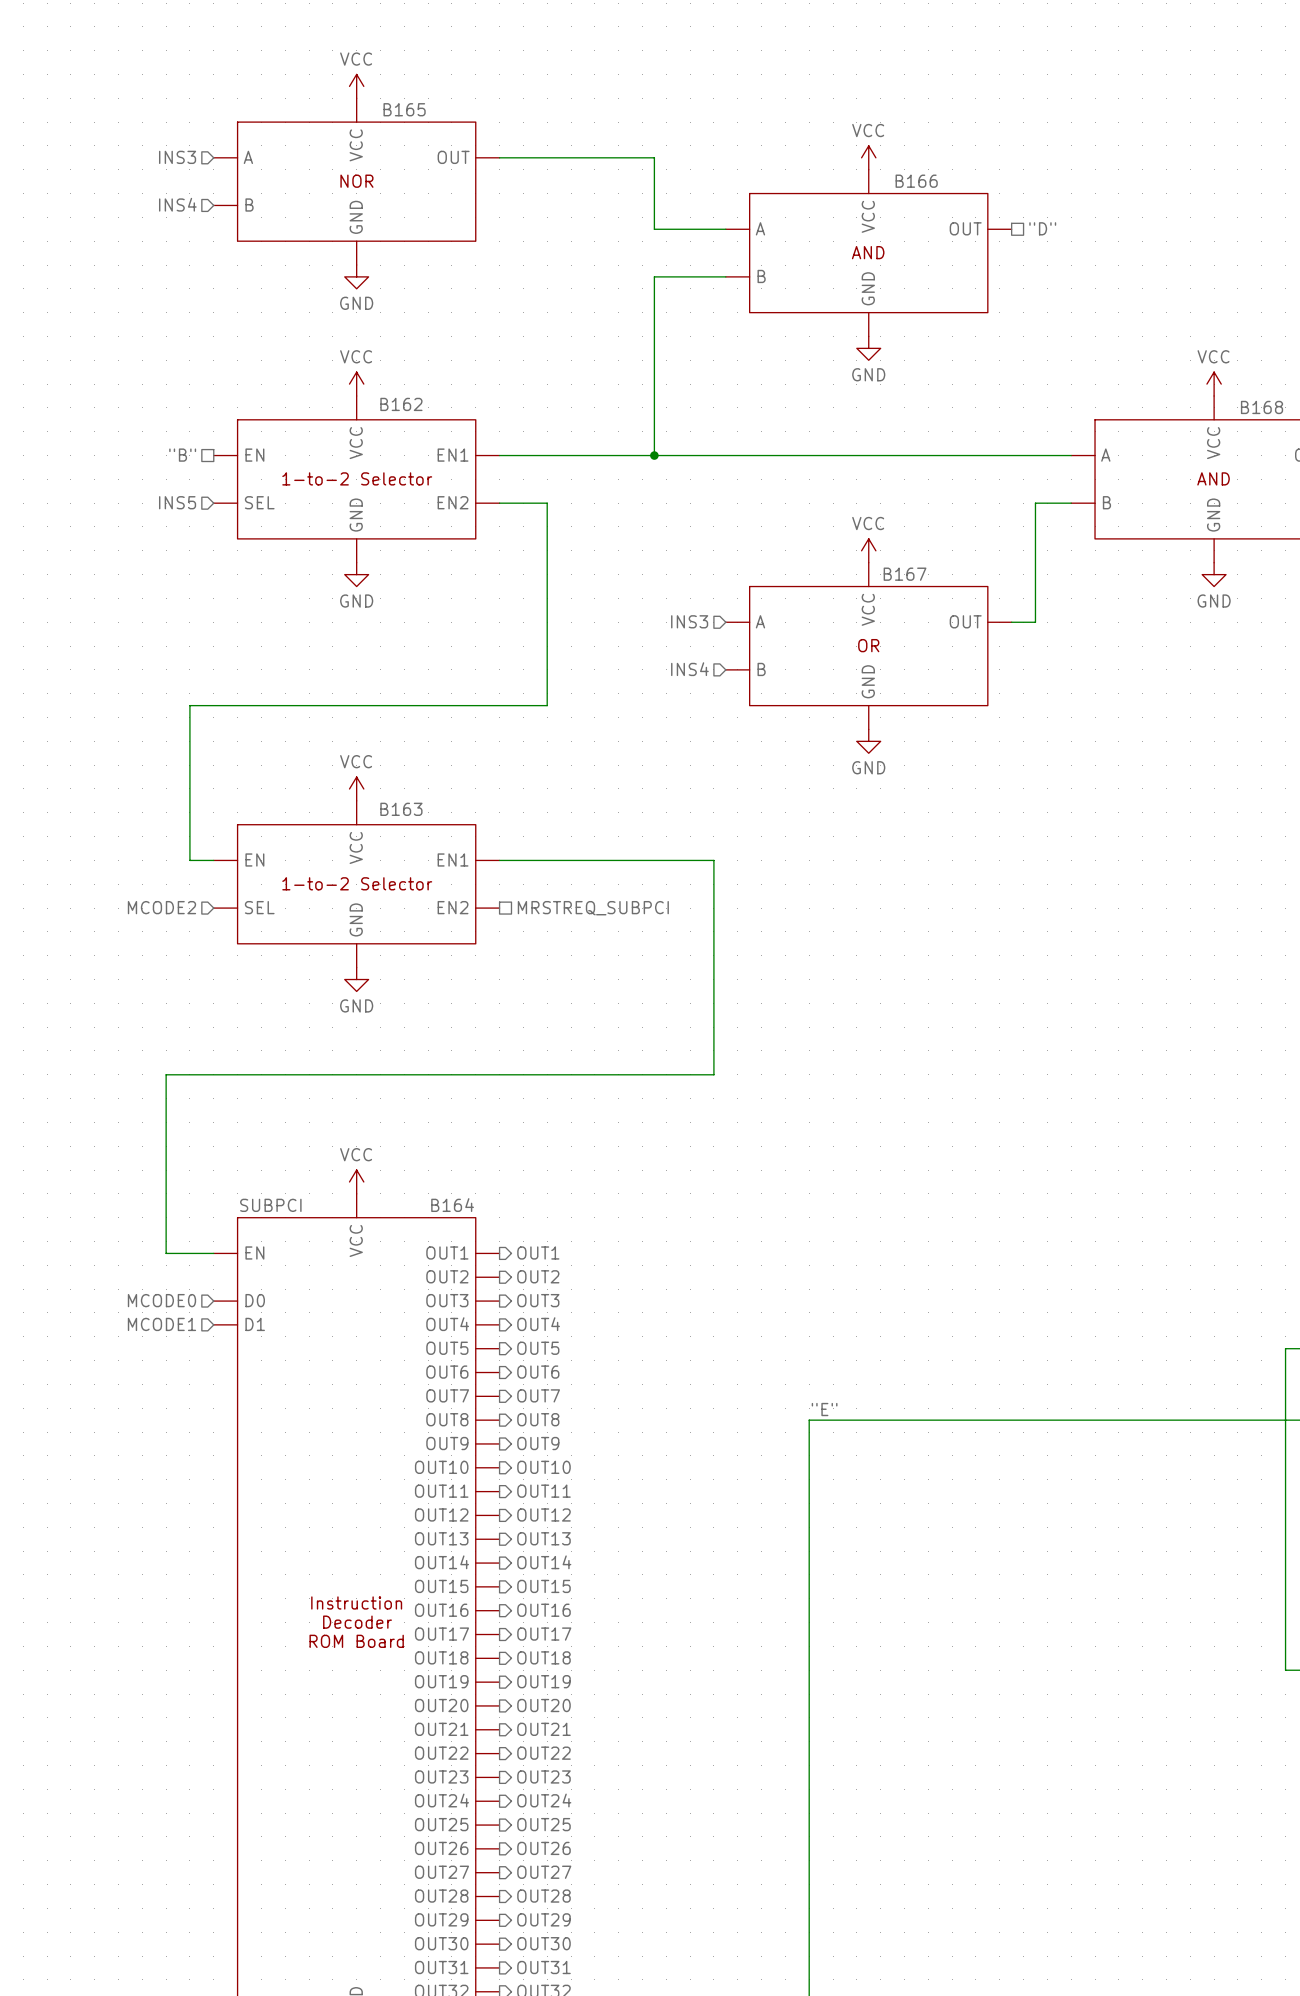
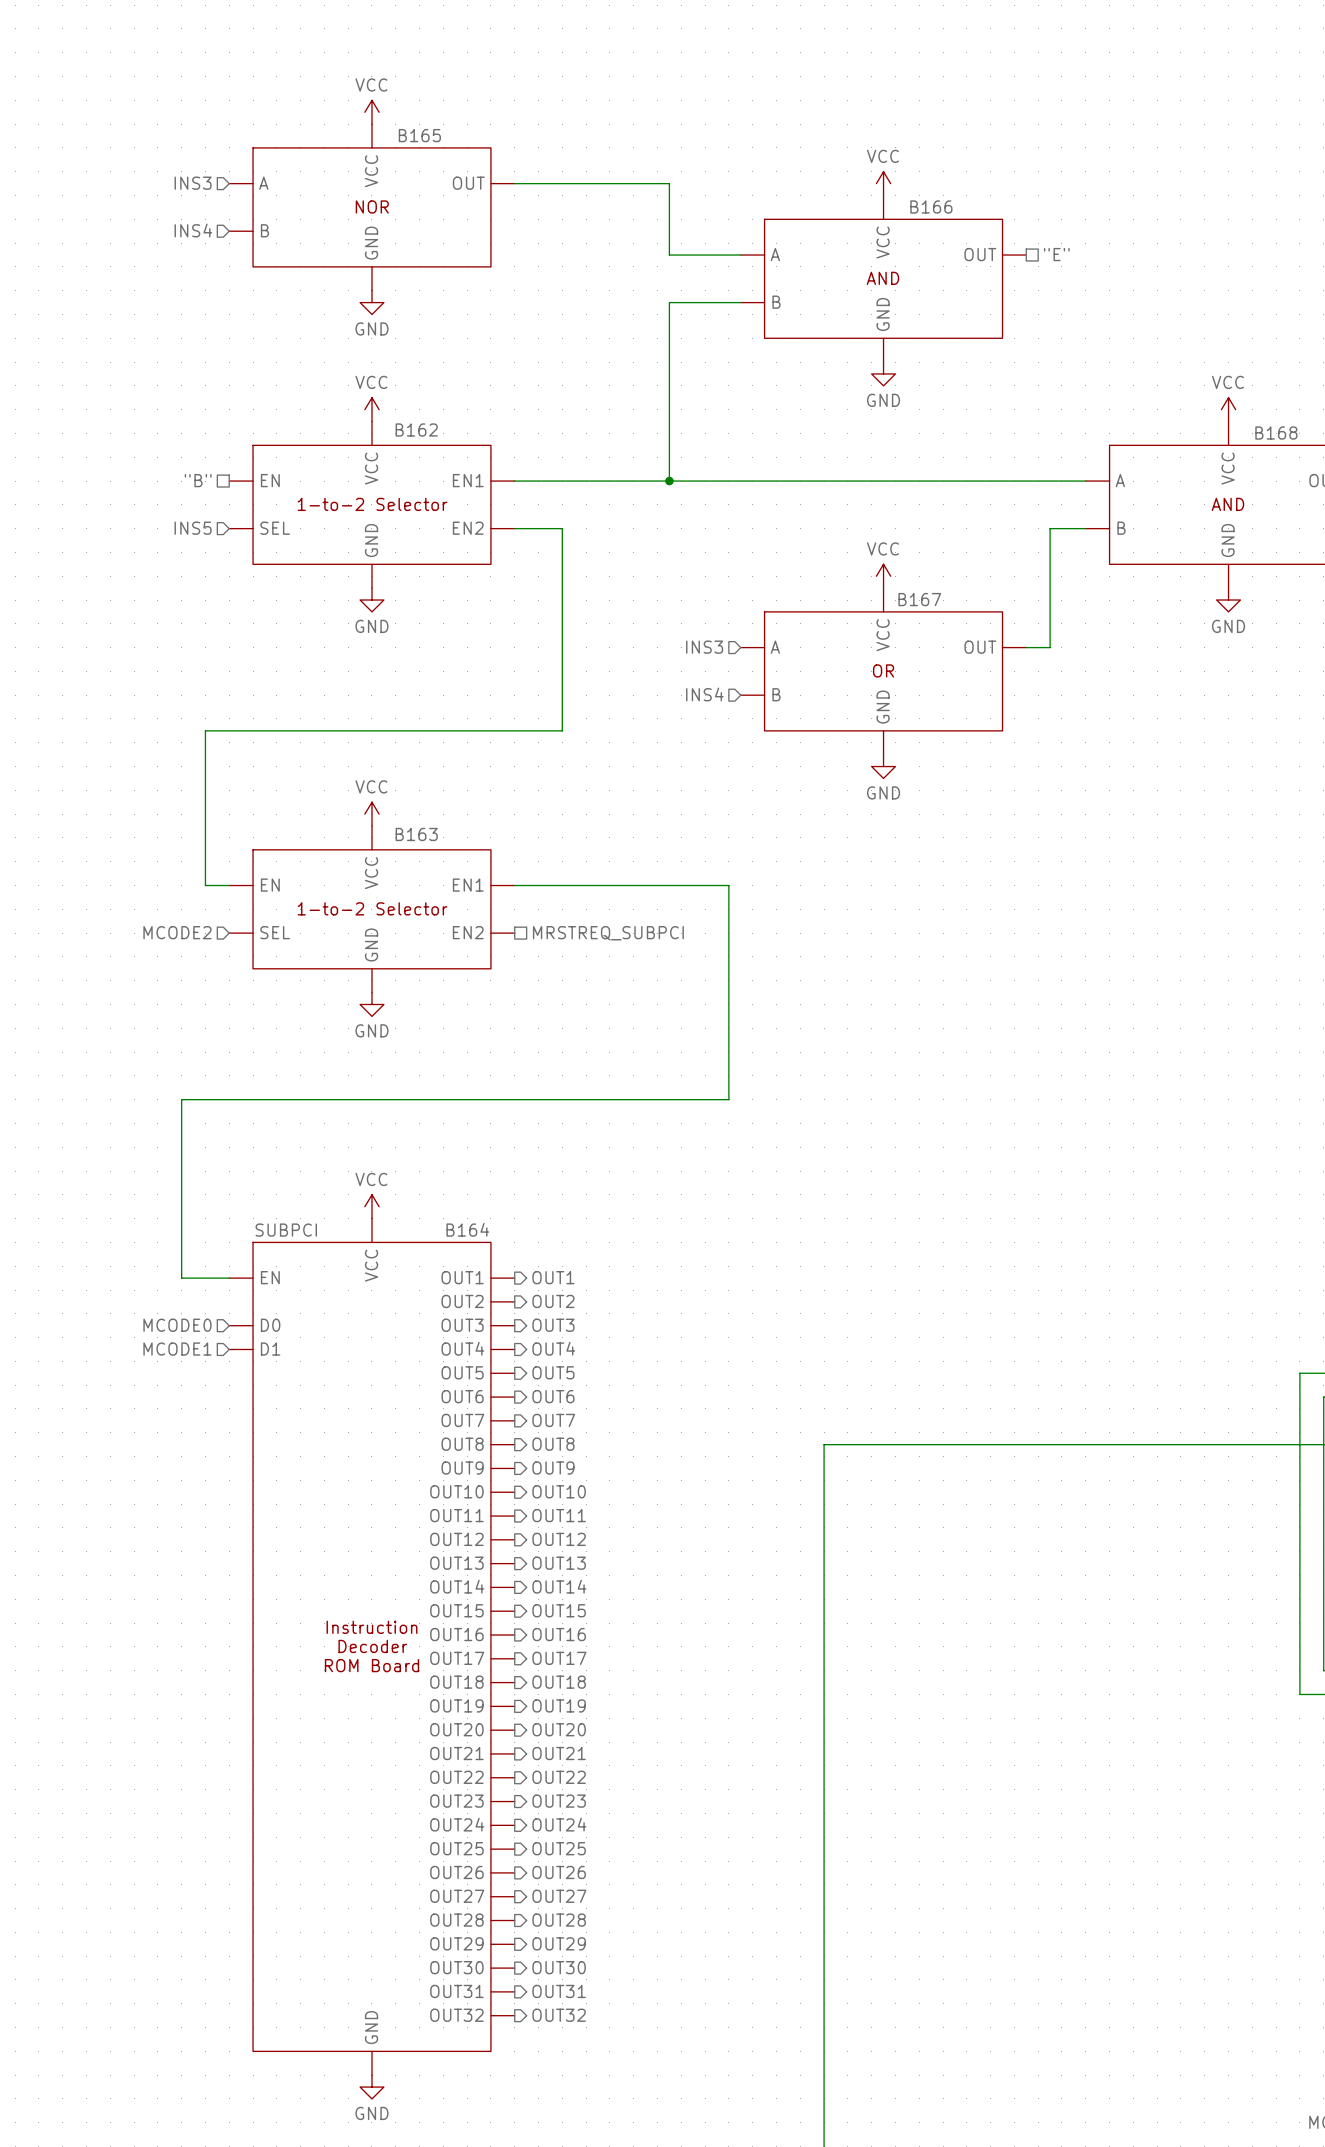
hierarchical label: "D" (1042, 228) -> "E" (1056, 254)
label: "E" (824, 1409) -> none

